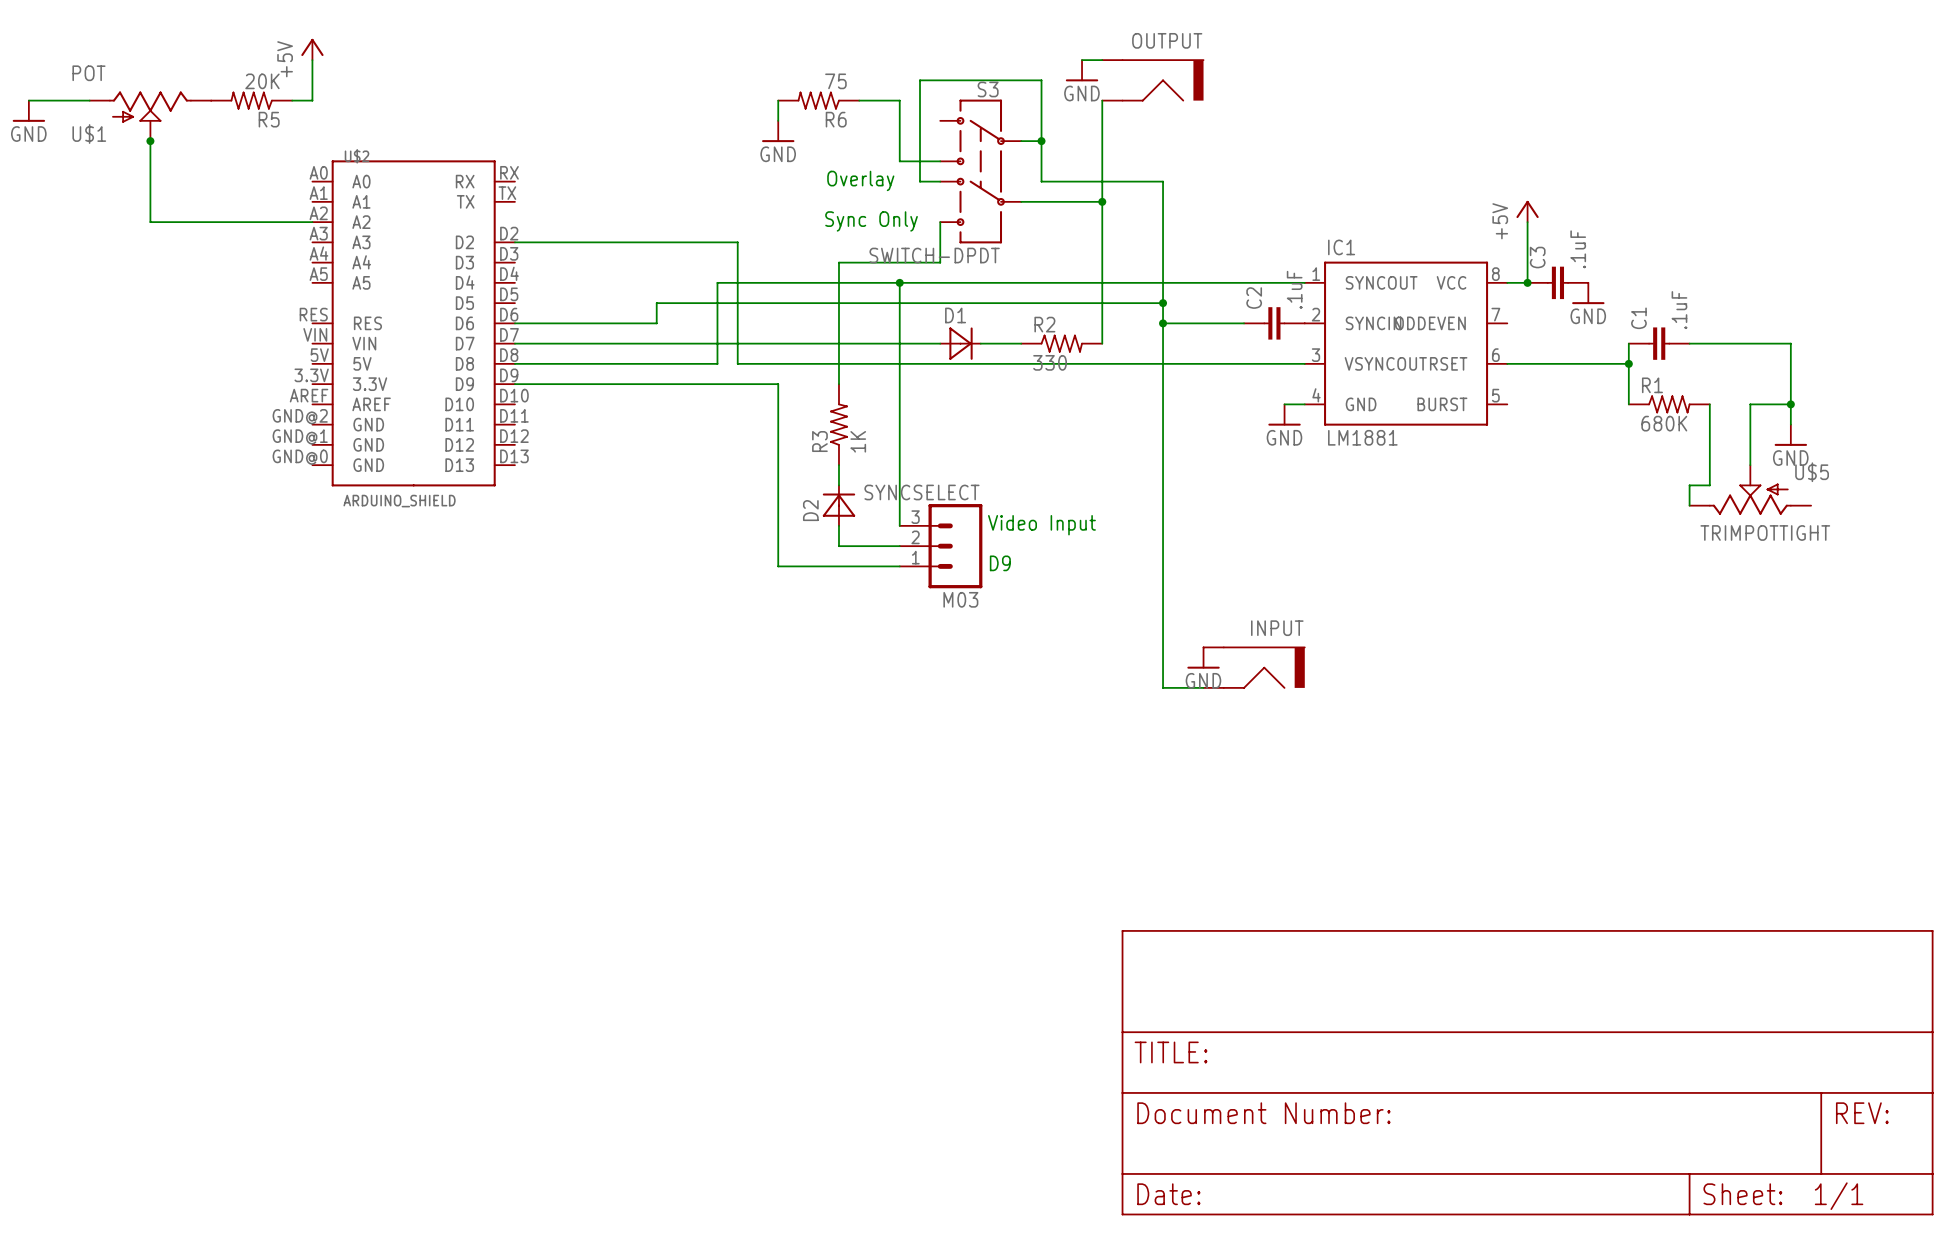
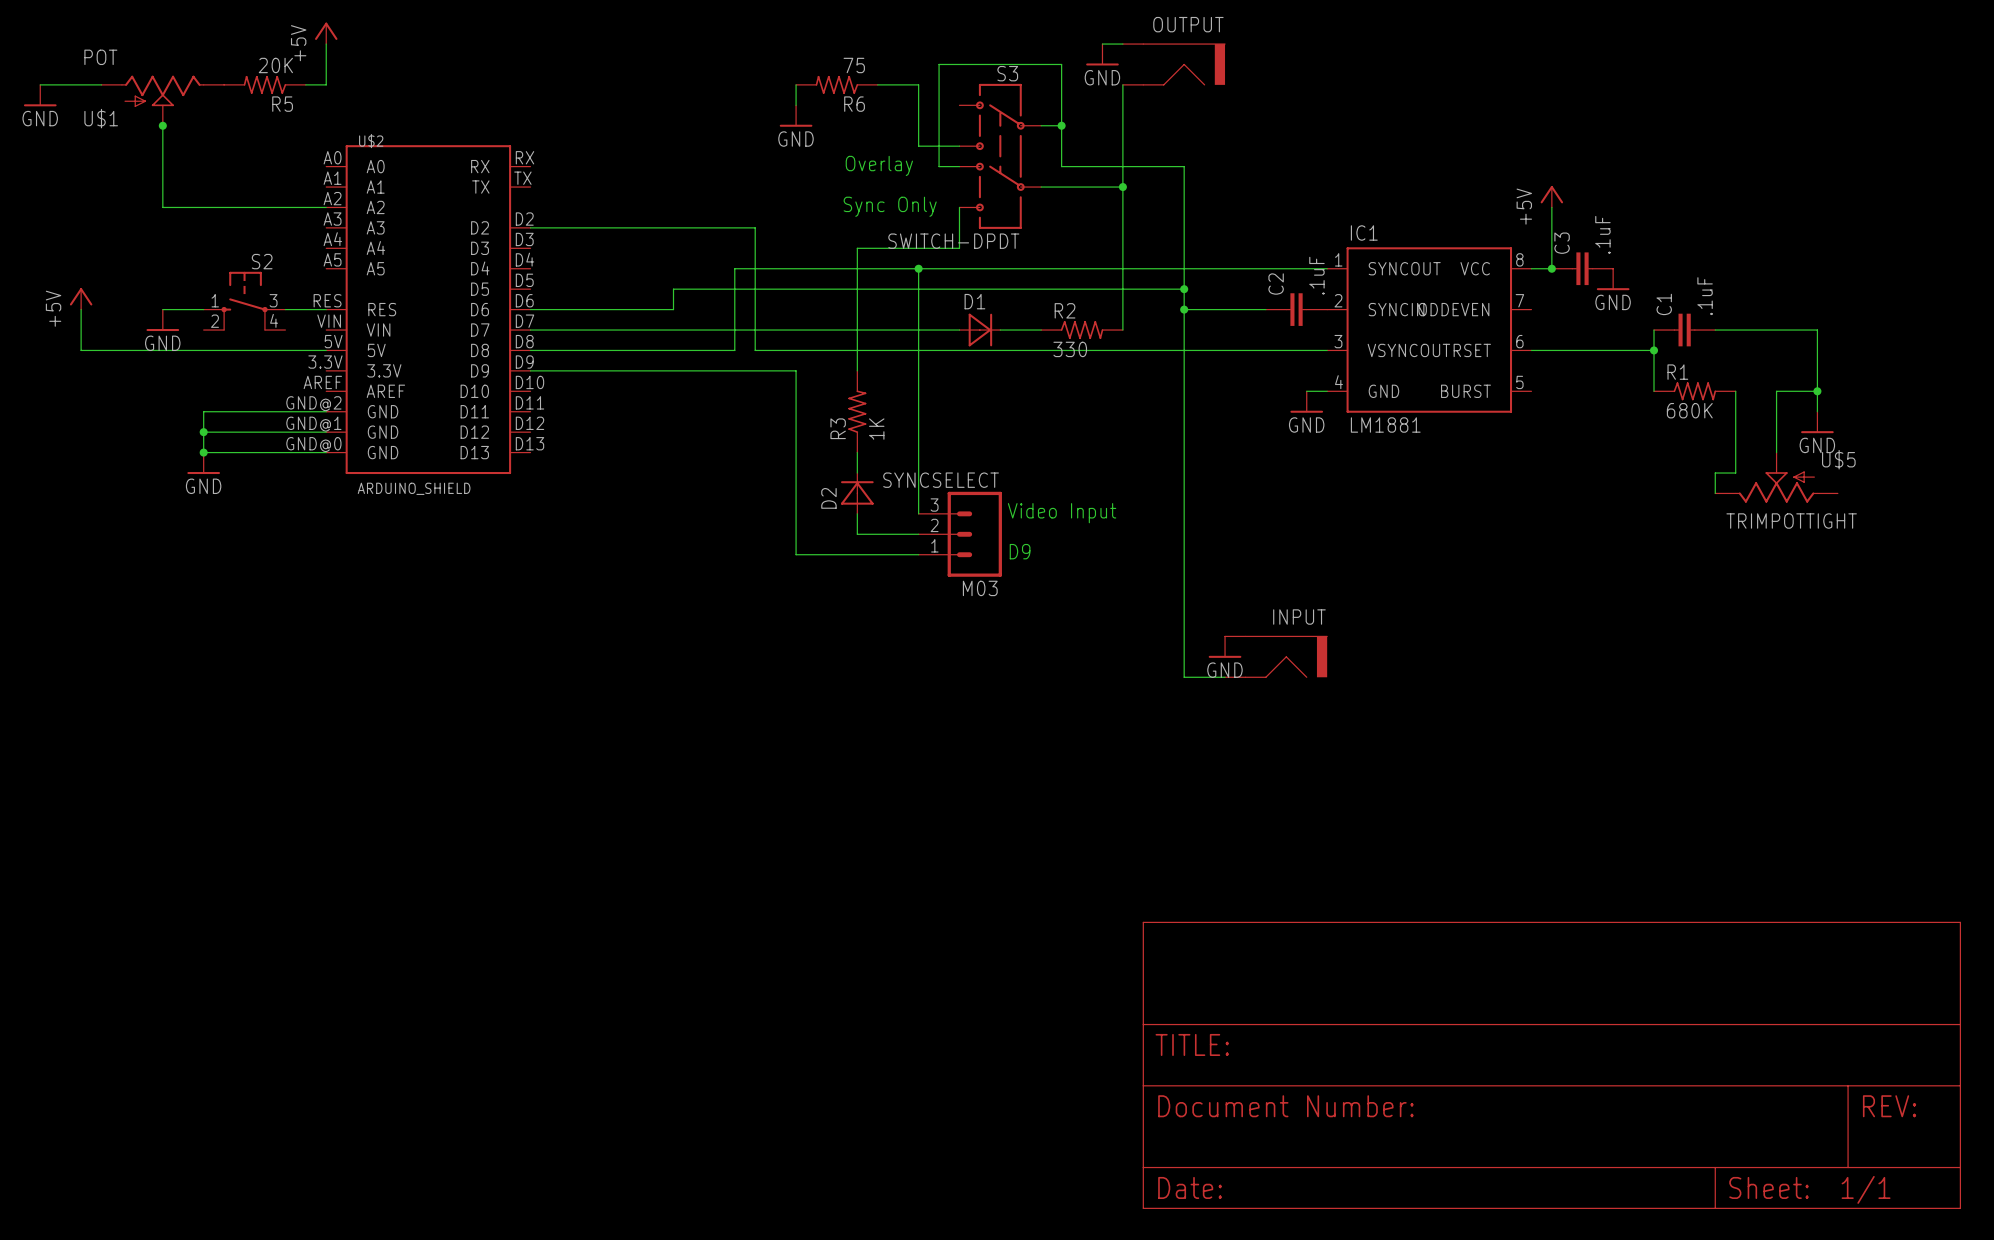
power symbol: none -> +5V (81, 298)
S2: none -> (244, 301)
wire: none -> (81, 309) (81, 350) (326, 350)
wire: none -> (162, 309) (203, 309)
wire: none -> (285, 309) (326, 309)
power symbol: none -> GND (162, 320)
wire: none -> (326, 411) (203, 411) (203, 452) (326, 452)
wire: none -> (203, 432) (326, 432)
junction: none -> (203, 432)
junction: none -> (203, 452)
power symbol: none -> GND (203, 463)

